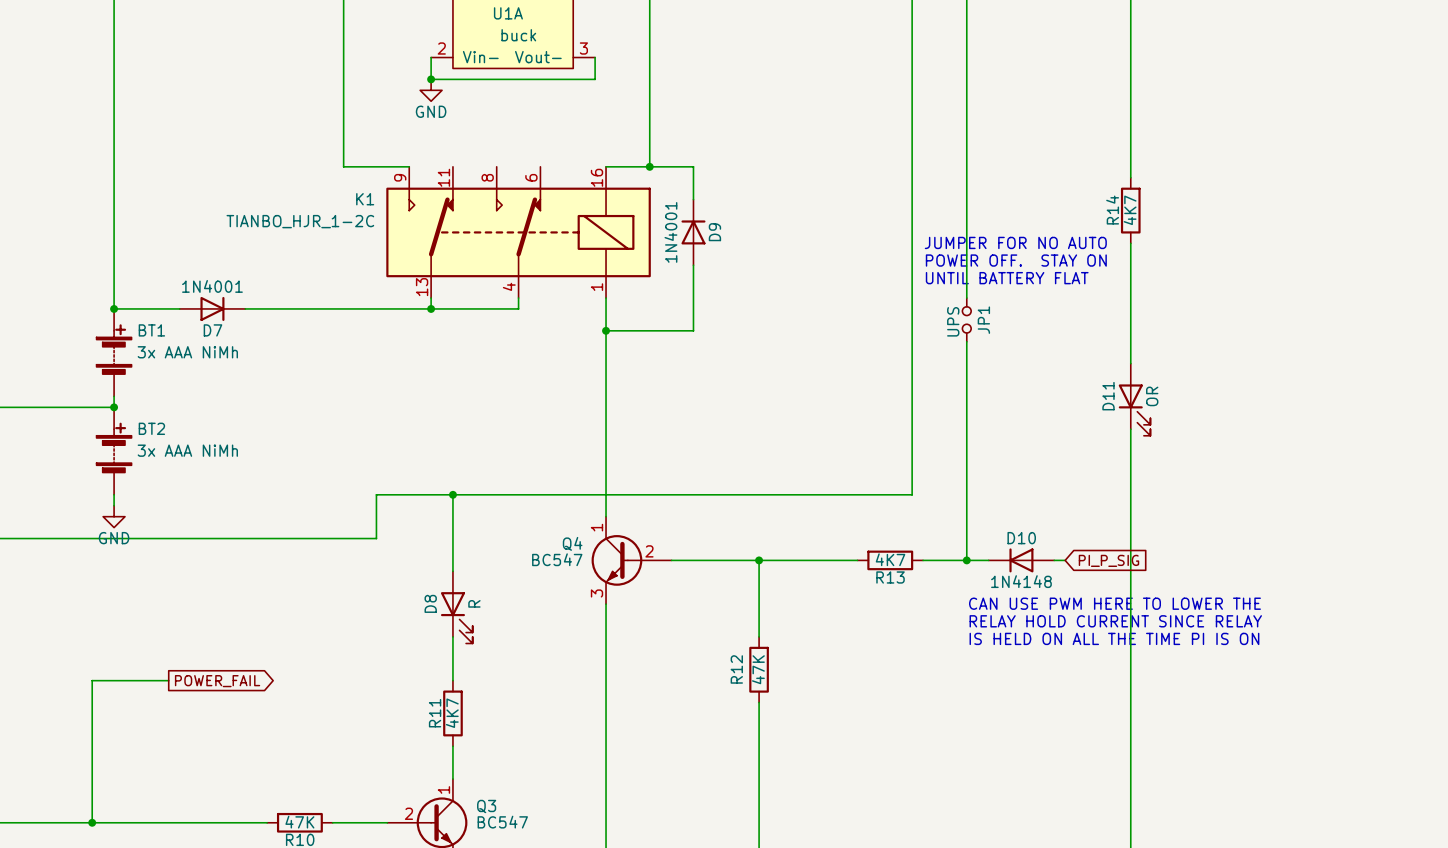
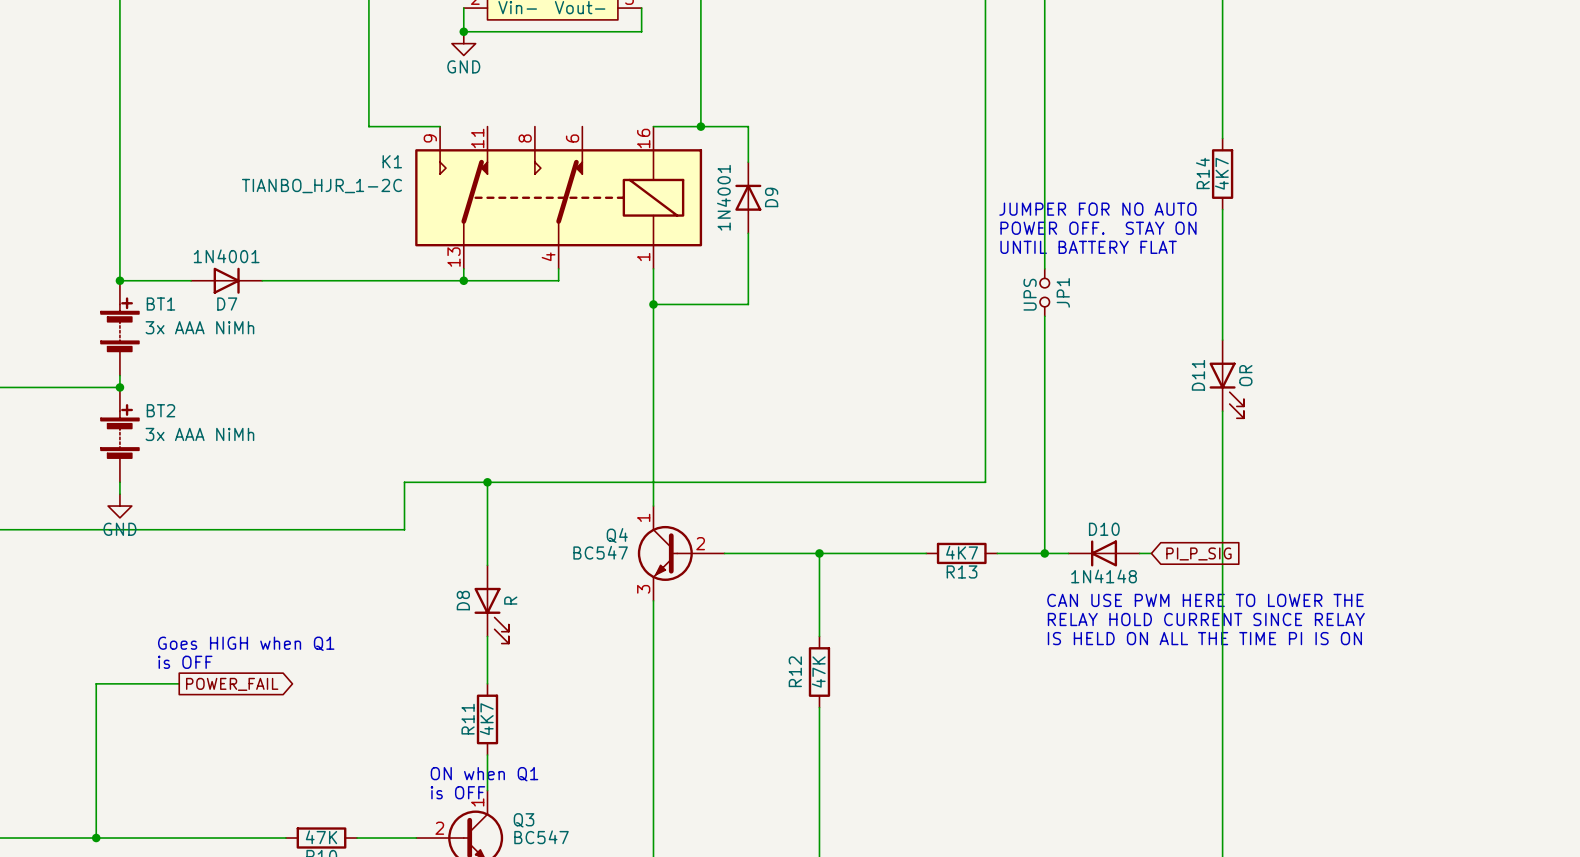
text: none -> Goes HIGH when Q1 (246, 643)
text: none -> is OFF (185, 662)
text: none -> ON when Q1 (484, 774)
text: none -> is OFF (457, 792)

